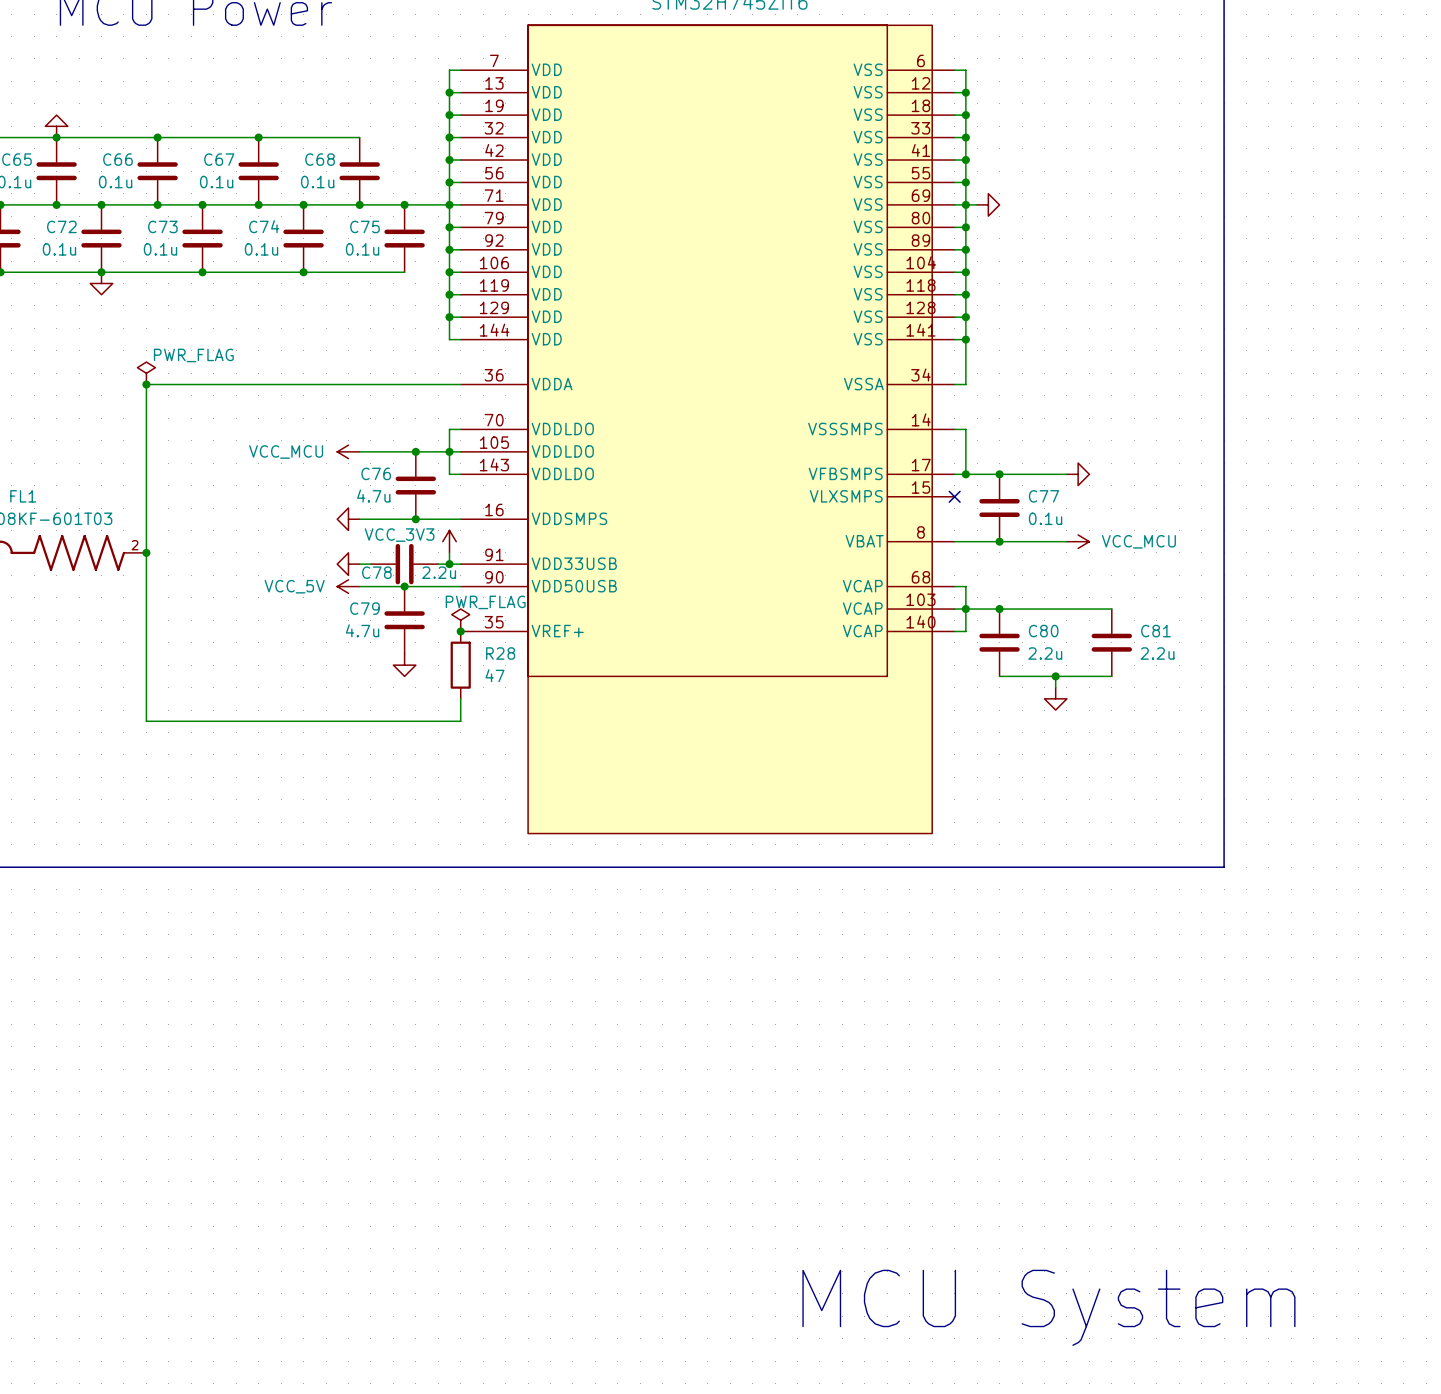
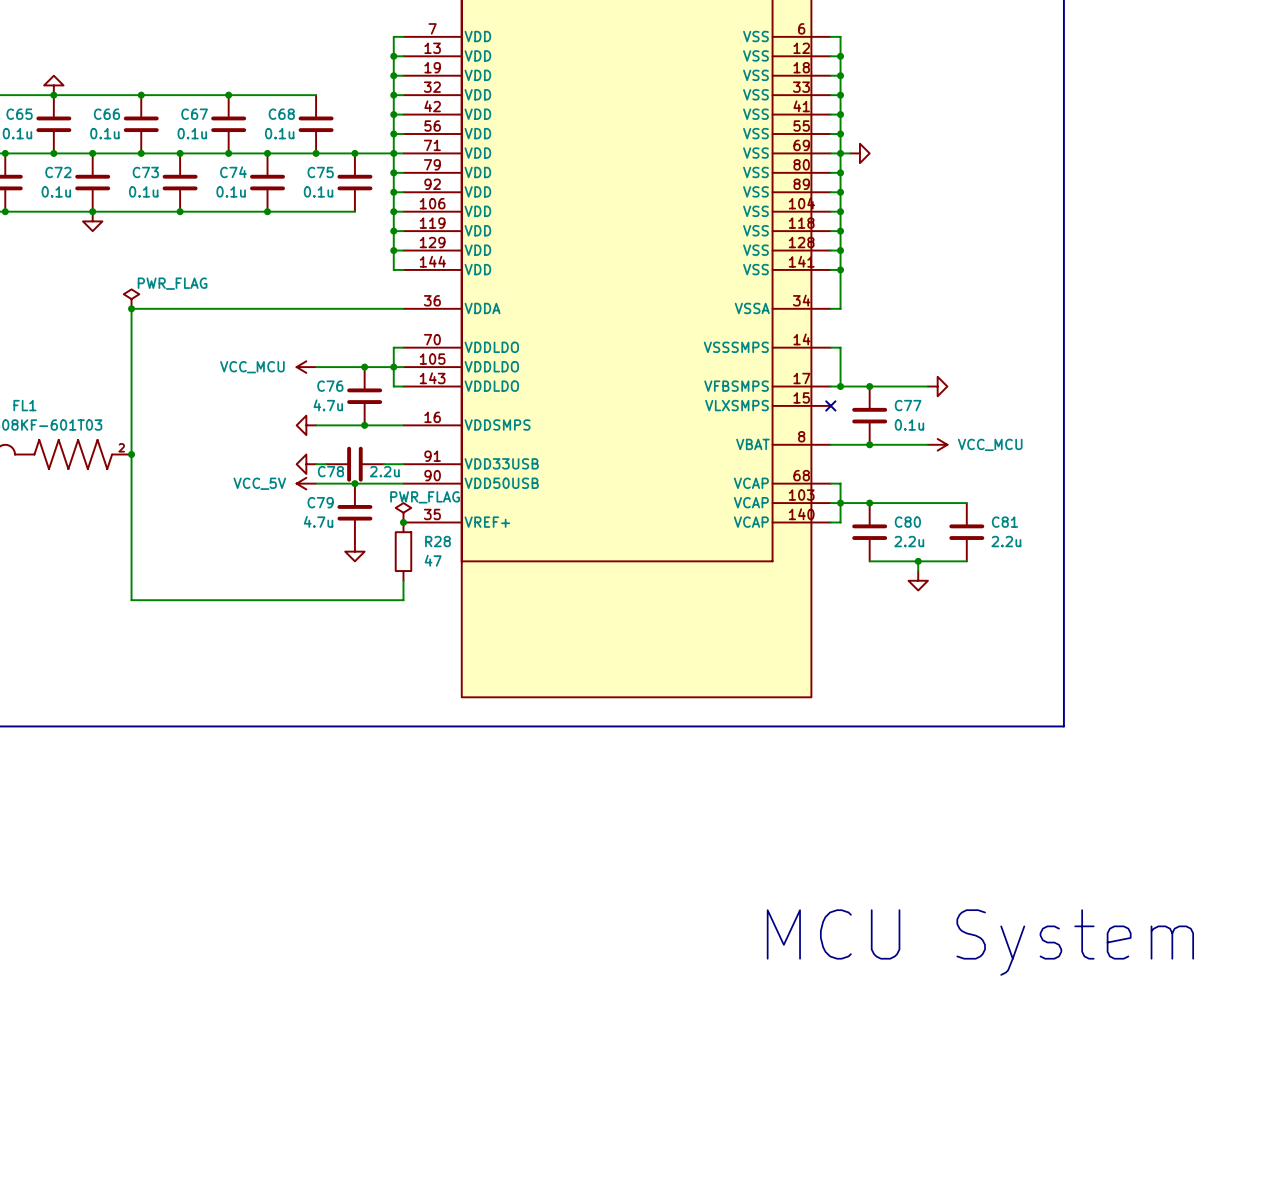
power symbol: VCC_3V3 (449, 541) -> none
wire: (449, 552) (449, 564) -> none
junction: (449, 564) -> none
text position: MCU System (1048, 1307) -> MCU System (980, 942)

